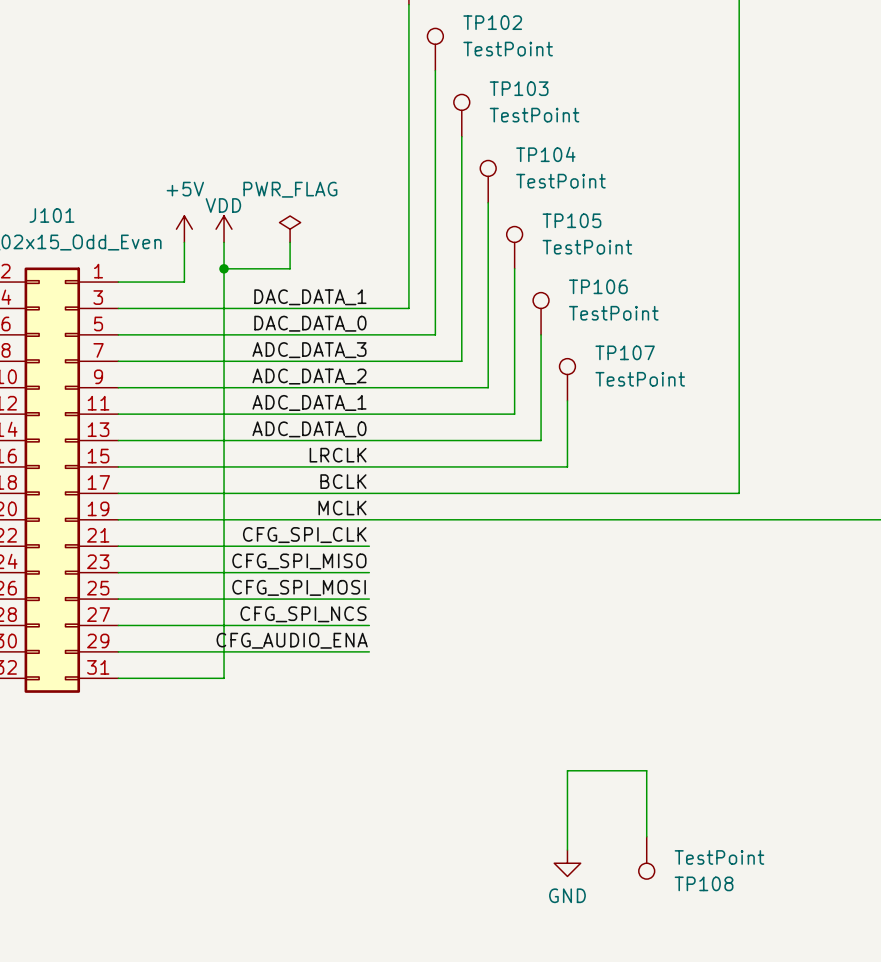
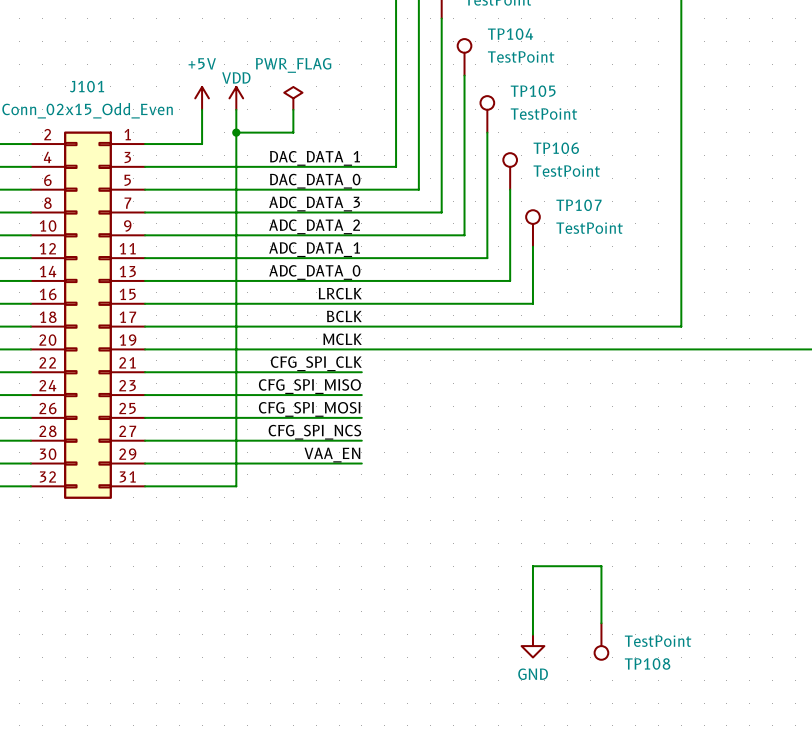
label: CFG_AUDIO_ENA (292, 640) -> VAA_EN (332, 455)

